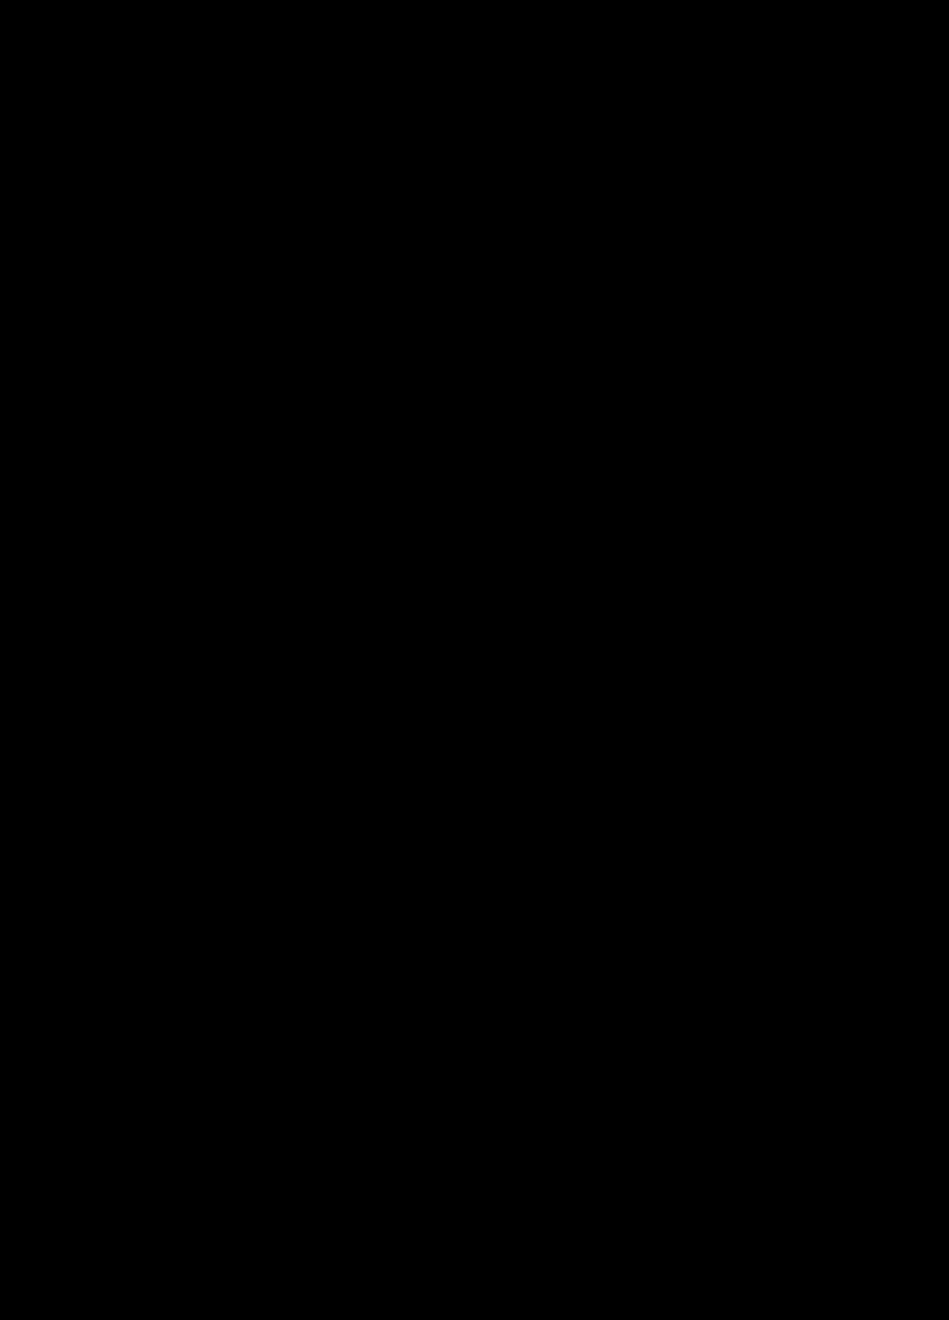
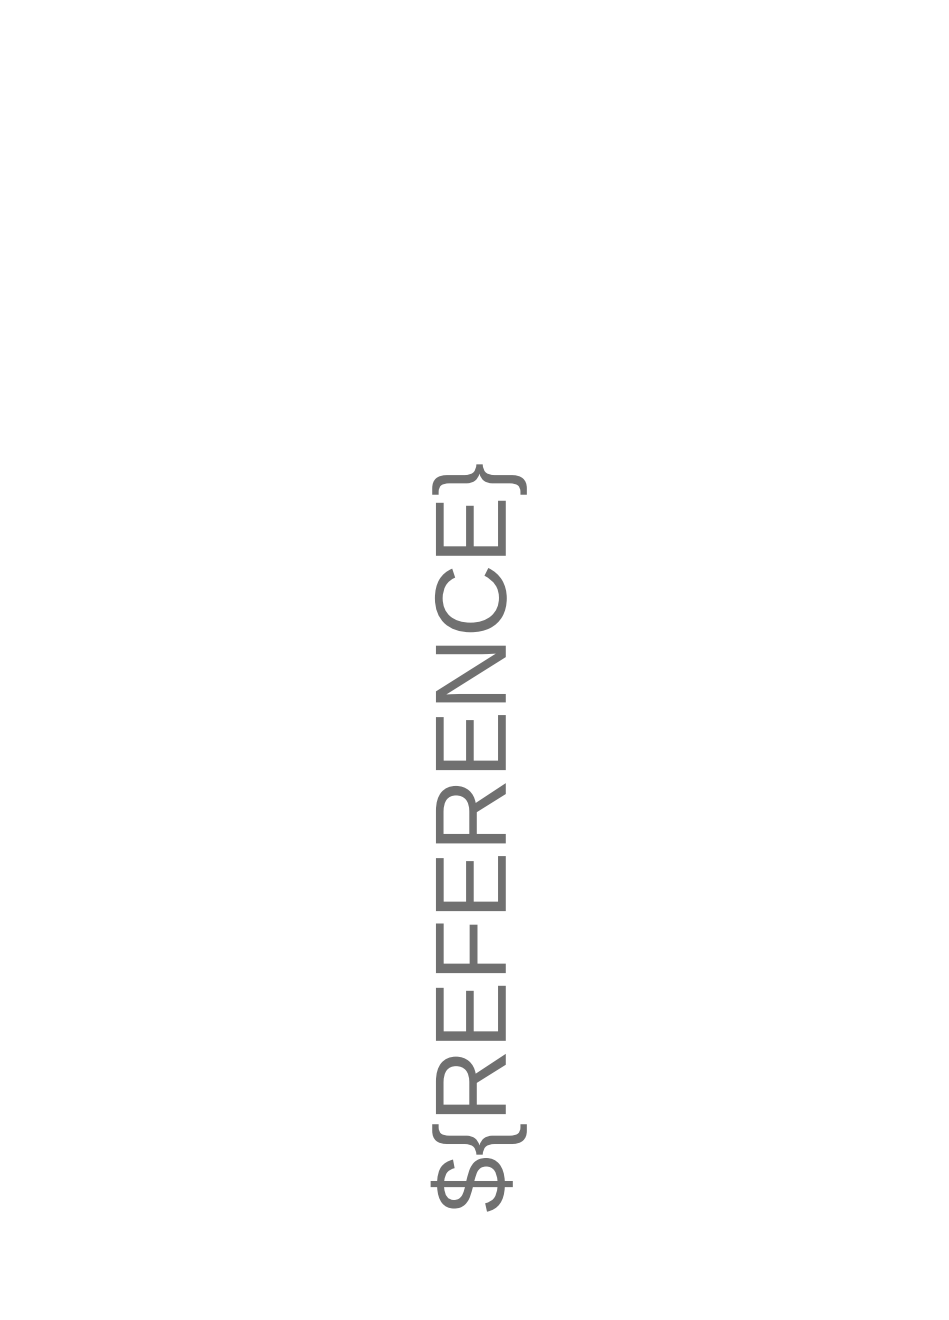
text: none -> ${REFERENCE} (478, 838)

